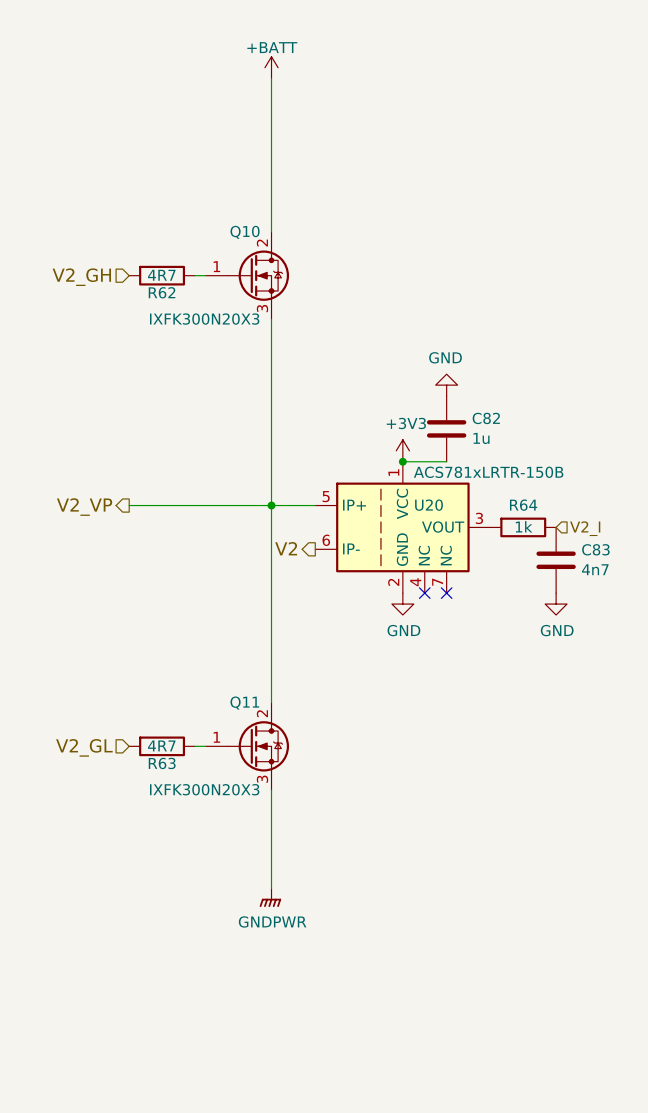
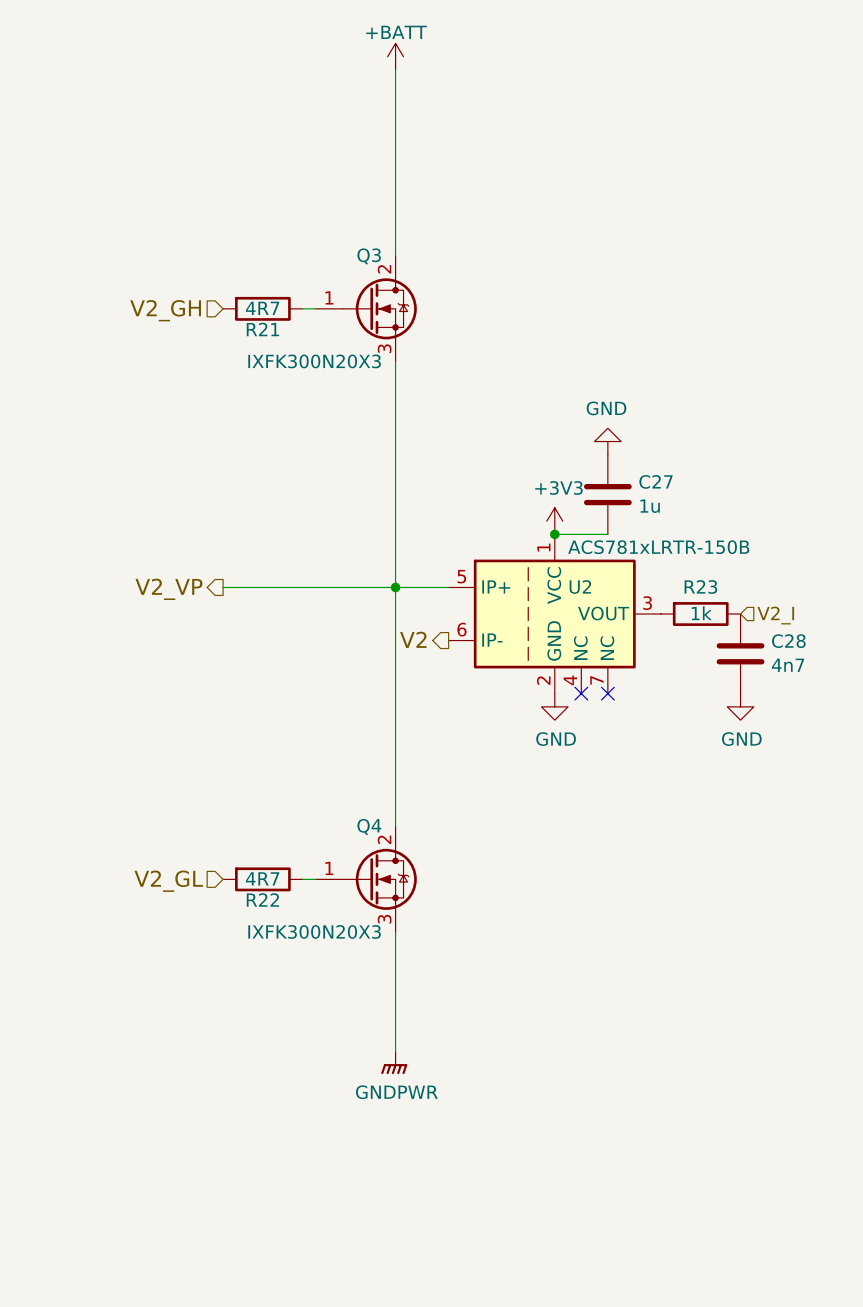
Q10 name: Q10 (245, 232) -> Q3 (369, 256)
R62 name: R62 (162, 292) -> R21 (262, 329)
C82 name: C82 (486, 418) -> C27 (656, 481)
U20 name: U20 (429, 505) -> U2 (580, 586)
R64 name: R64 (523, 505) -> R23 (700, 586)
C83 name: C83 (595, 549) -> C28 (788, 641)
Q11 name: Q11 (244, 703) -> Q4 (369, 826)
R63 name: R63 (162, 763) -> R22 (262, 899)

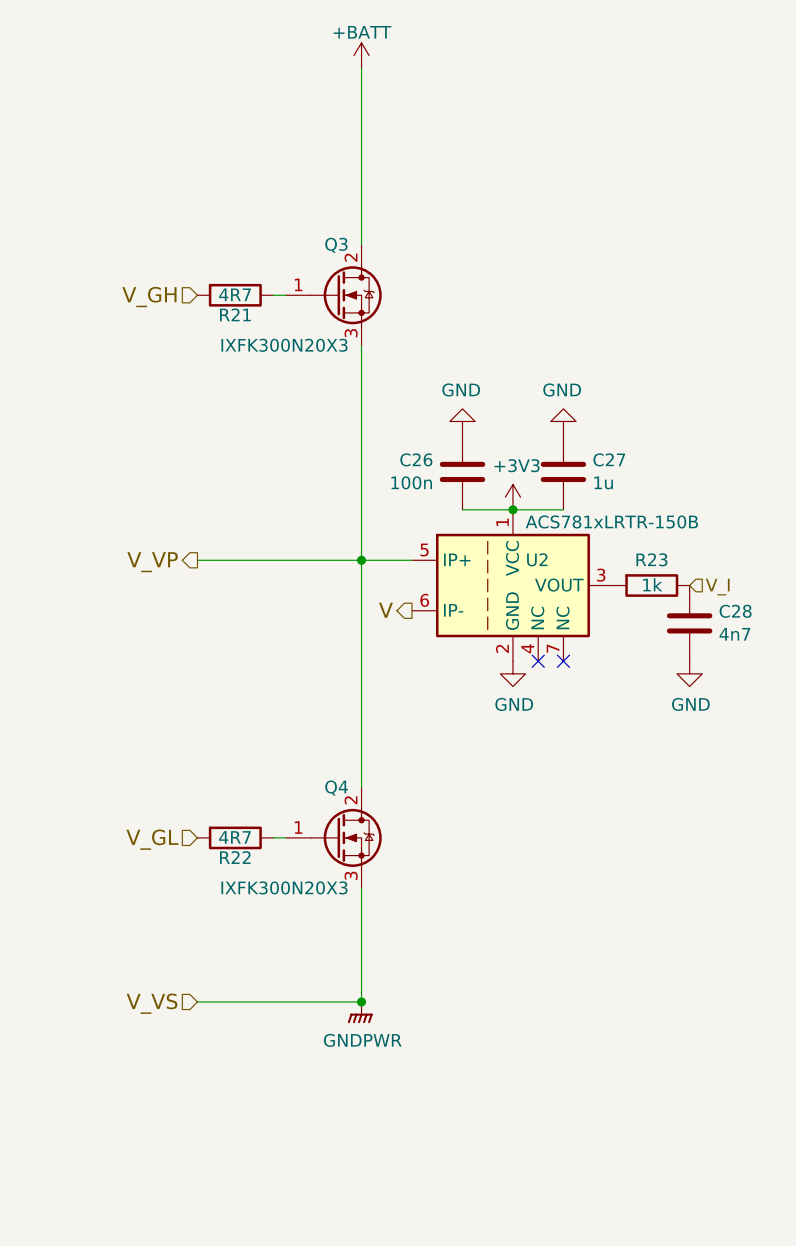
hierarchical label: V2_GH (165, 310) -> V_GH (149, 297)
power symbol: none -> GND (462, 421)
C26: none -> 100n (462, 471)
wire: none -> (462, 509) (512, 509)
hierarchical label: V2_VP (168, 589) -> V_VP (152, 562)
hierarchical label: V2_I (775, 615) -> V_I (717, 587)
hierarchical label: V2 (413, 639) -> V (385, 610)
hierarchical label: V2_GL (168, 881) -> V_GL (152, 839)
wire: none -> (197, 1001) (361, 1001)
junction: none -> (361, 1001)
hierarchical label: none -> V_VS (152, 1003)

